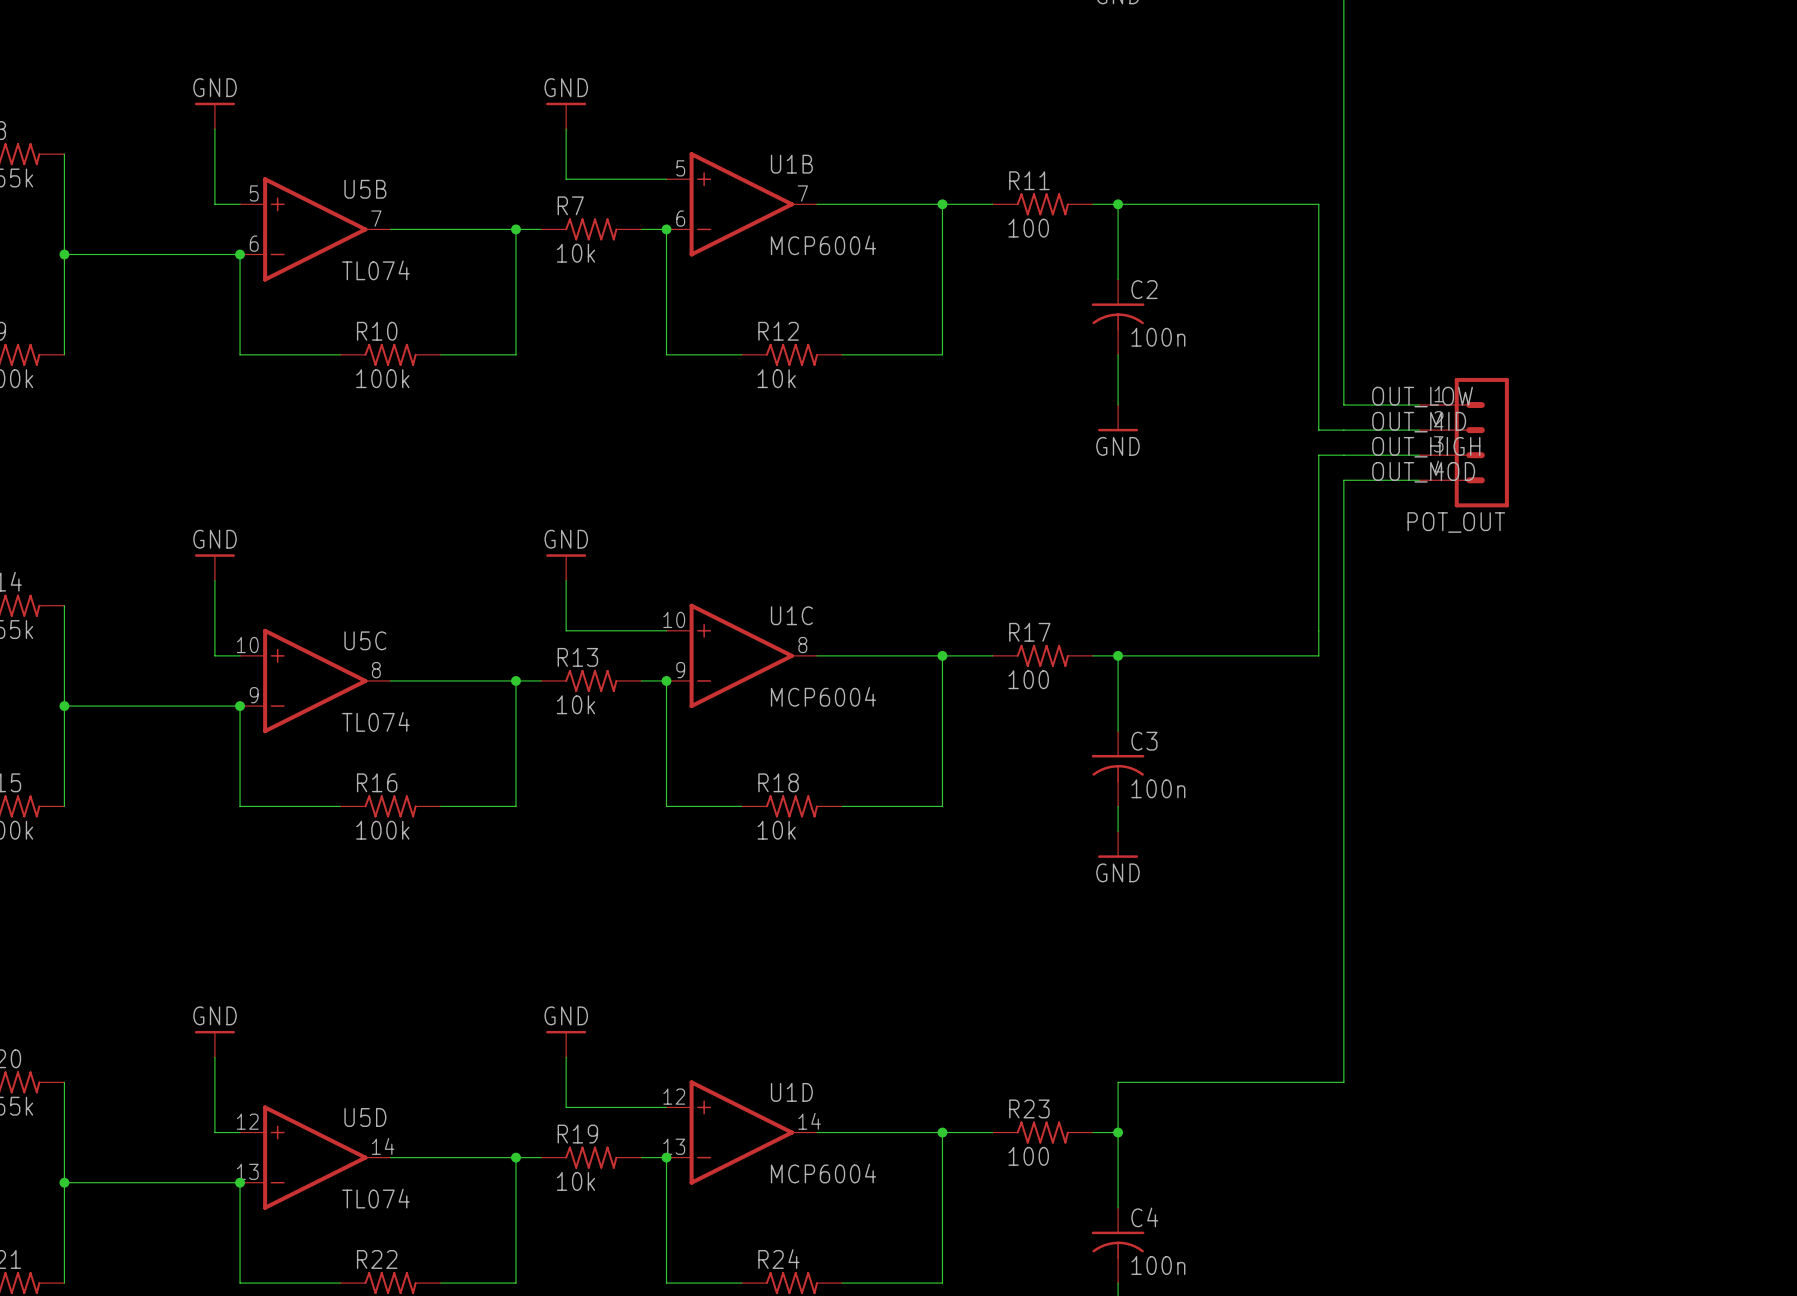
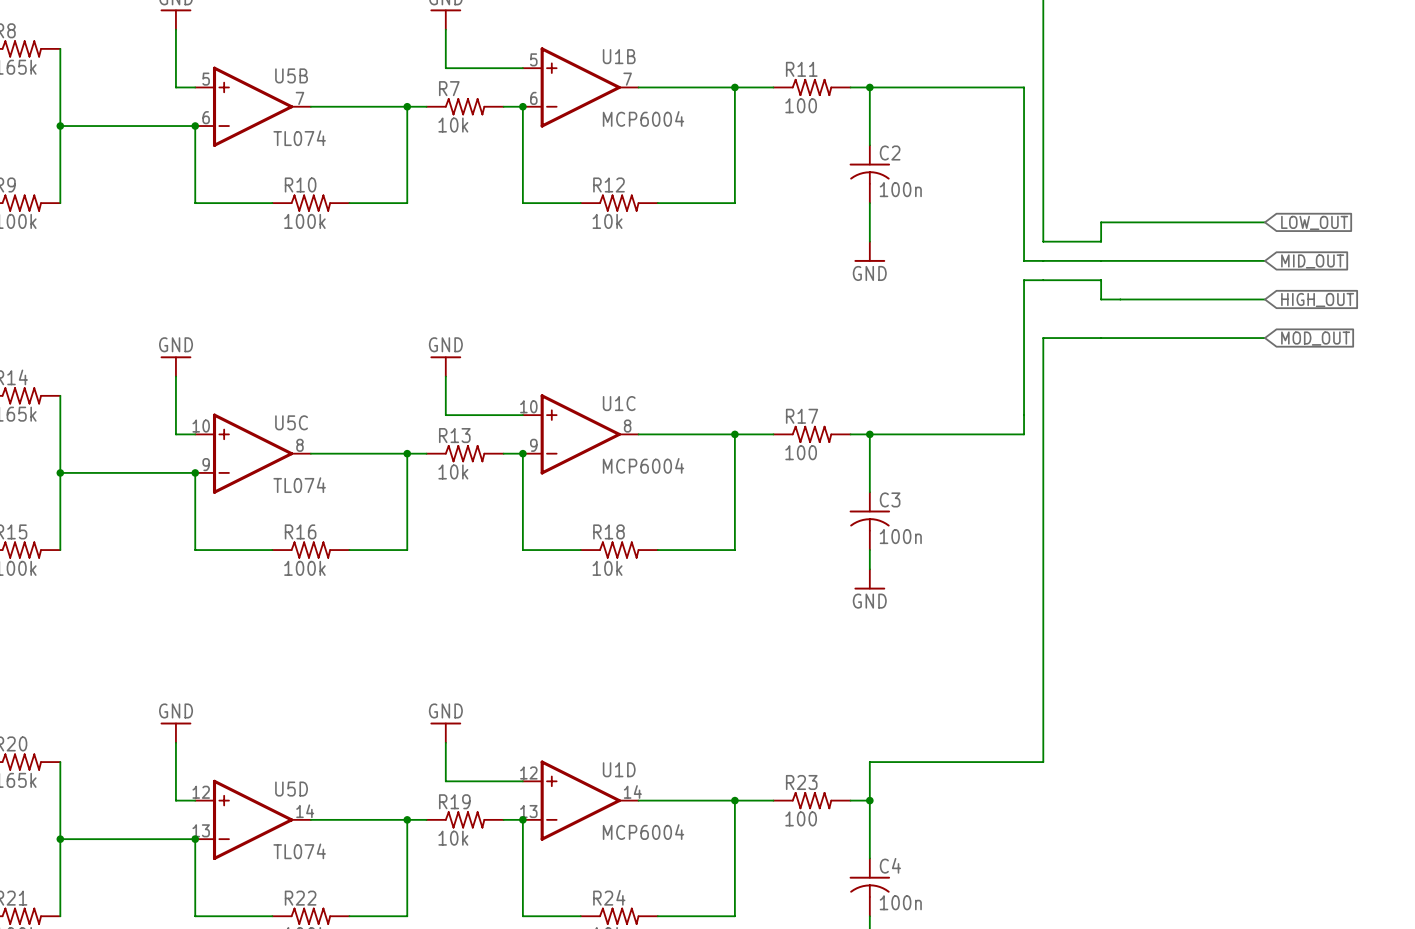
wire: none -> (1264, 222) (1101, 222) (1101, 241)
global label: none -> LOW_OUT (1314, 222)
label: OUT_LOW (1422, 397) -> none
label: OUT_MID (1419, 422) -> none
wire: none -> (1101, 260) (1264, 260)
global label: none -> MID_OUT (1312, 261)
POT_OUT: (1464, 442) -> none
label: OUT_HIGH (1426, 447) -> none
wire: none -> (1101, 280) (1101, 299) (1264, 299)
label: OUT_MOD (1423, 472) -> none
wire: (1419, 480) (1343, 480) (1343, 530) -> (1264, 338) (1043, 338)
global label: none -> HIGH_OUT (1317, 300)
global label: none -> MOD_OUT (1315, 338)

